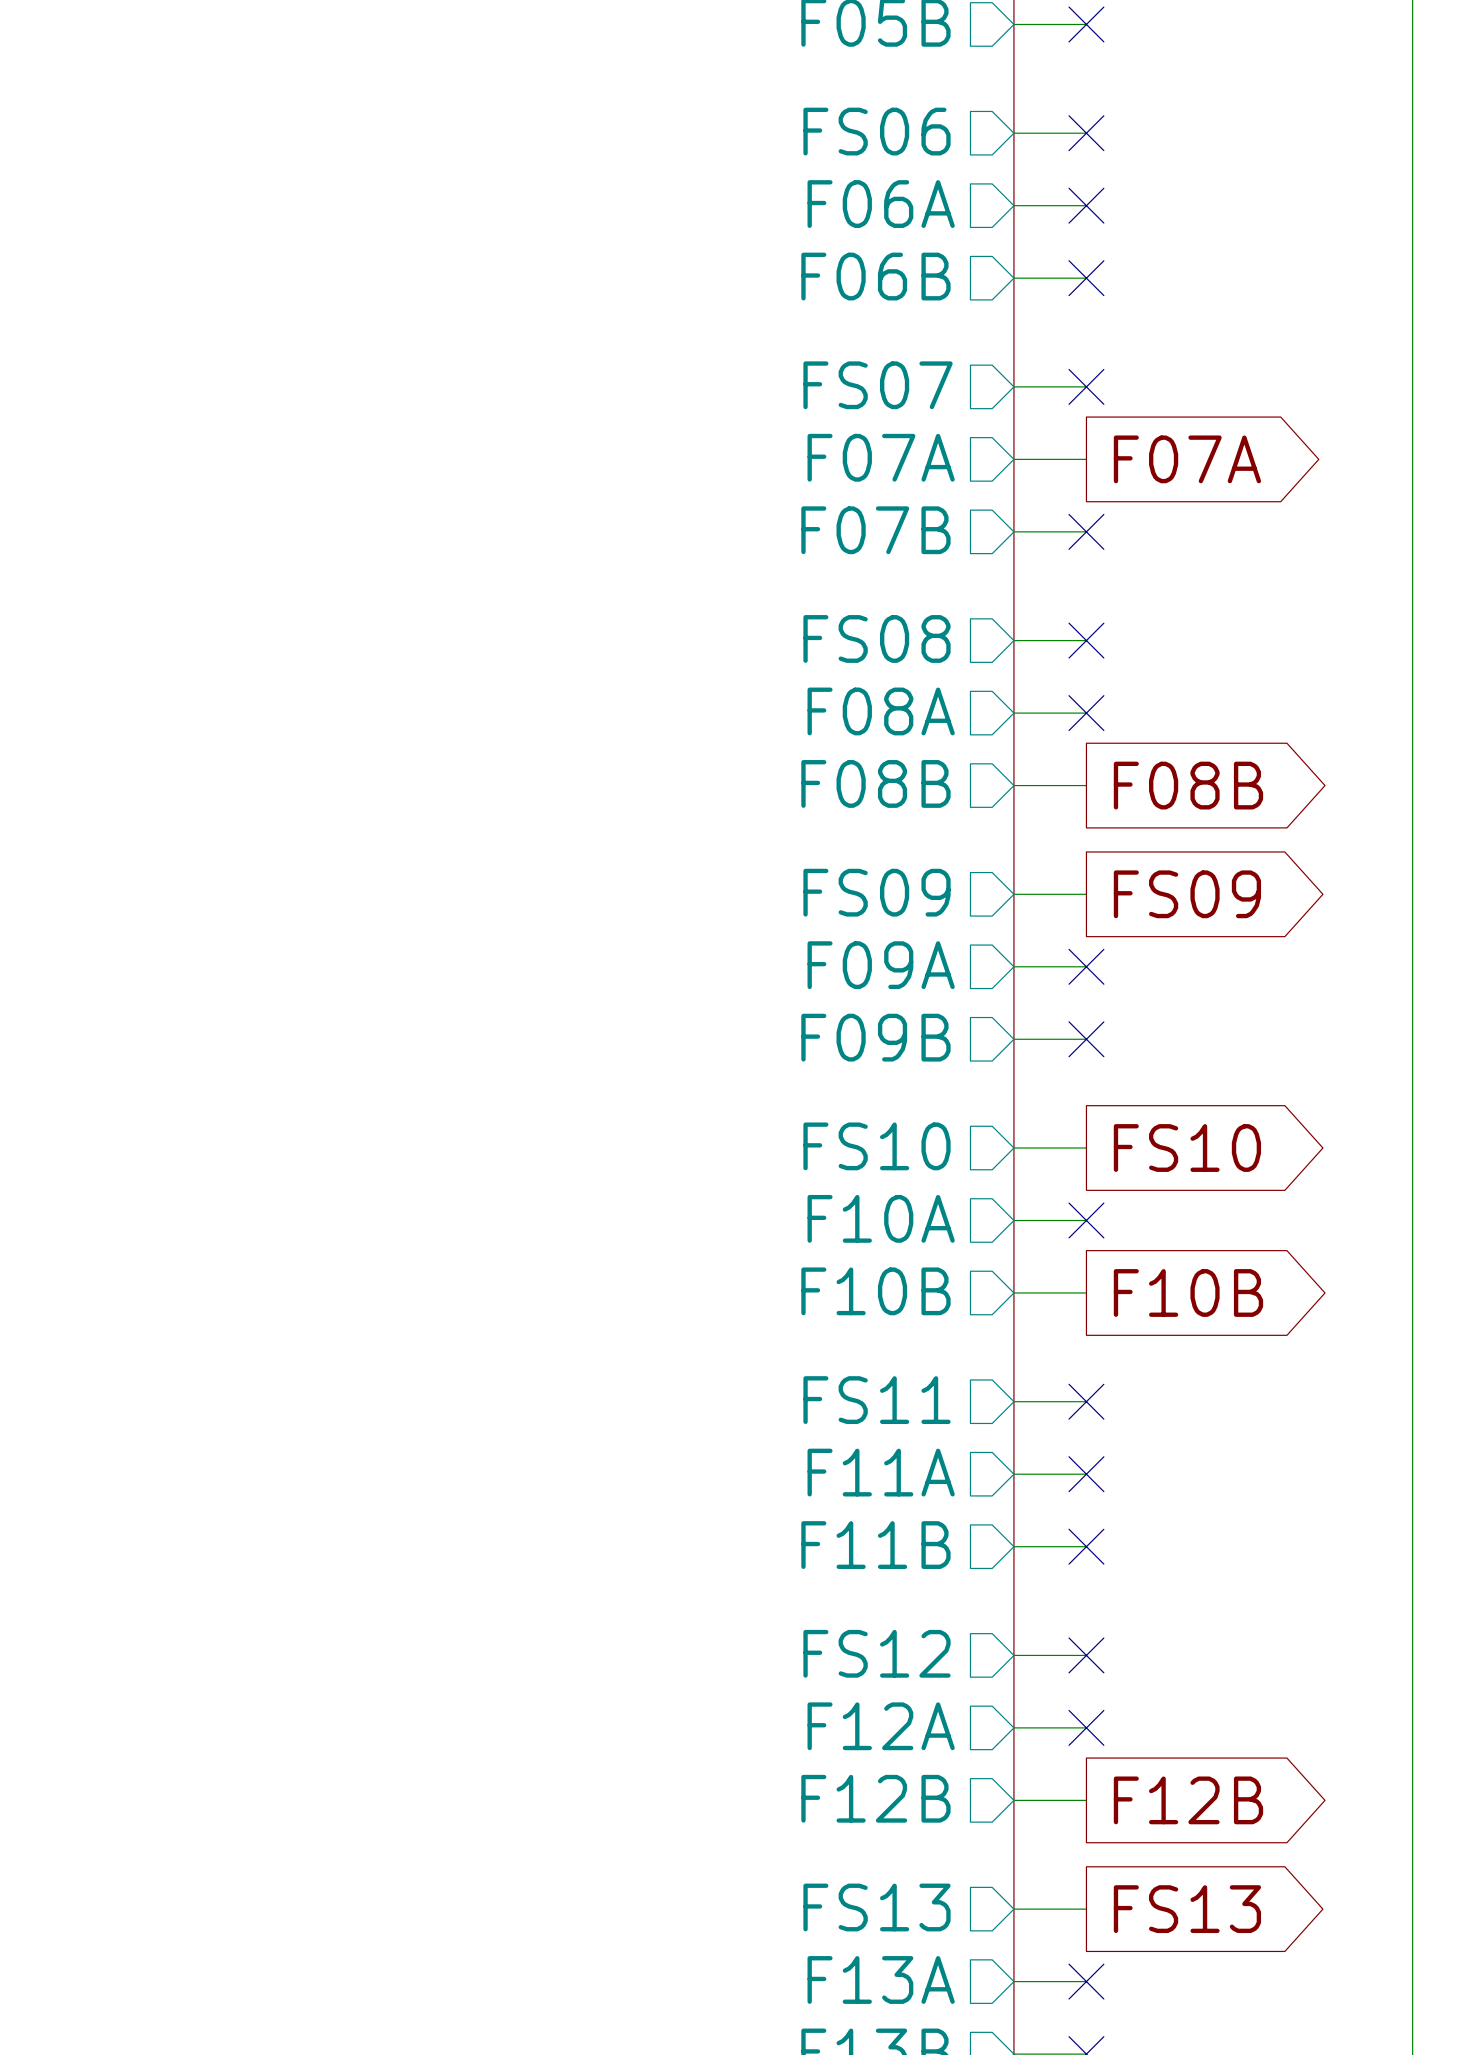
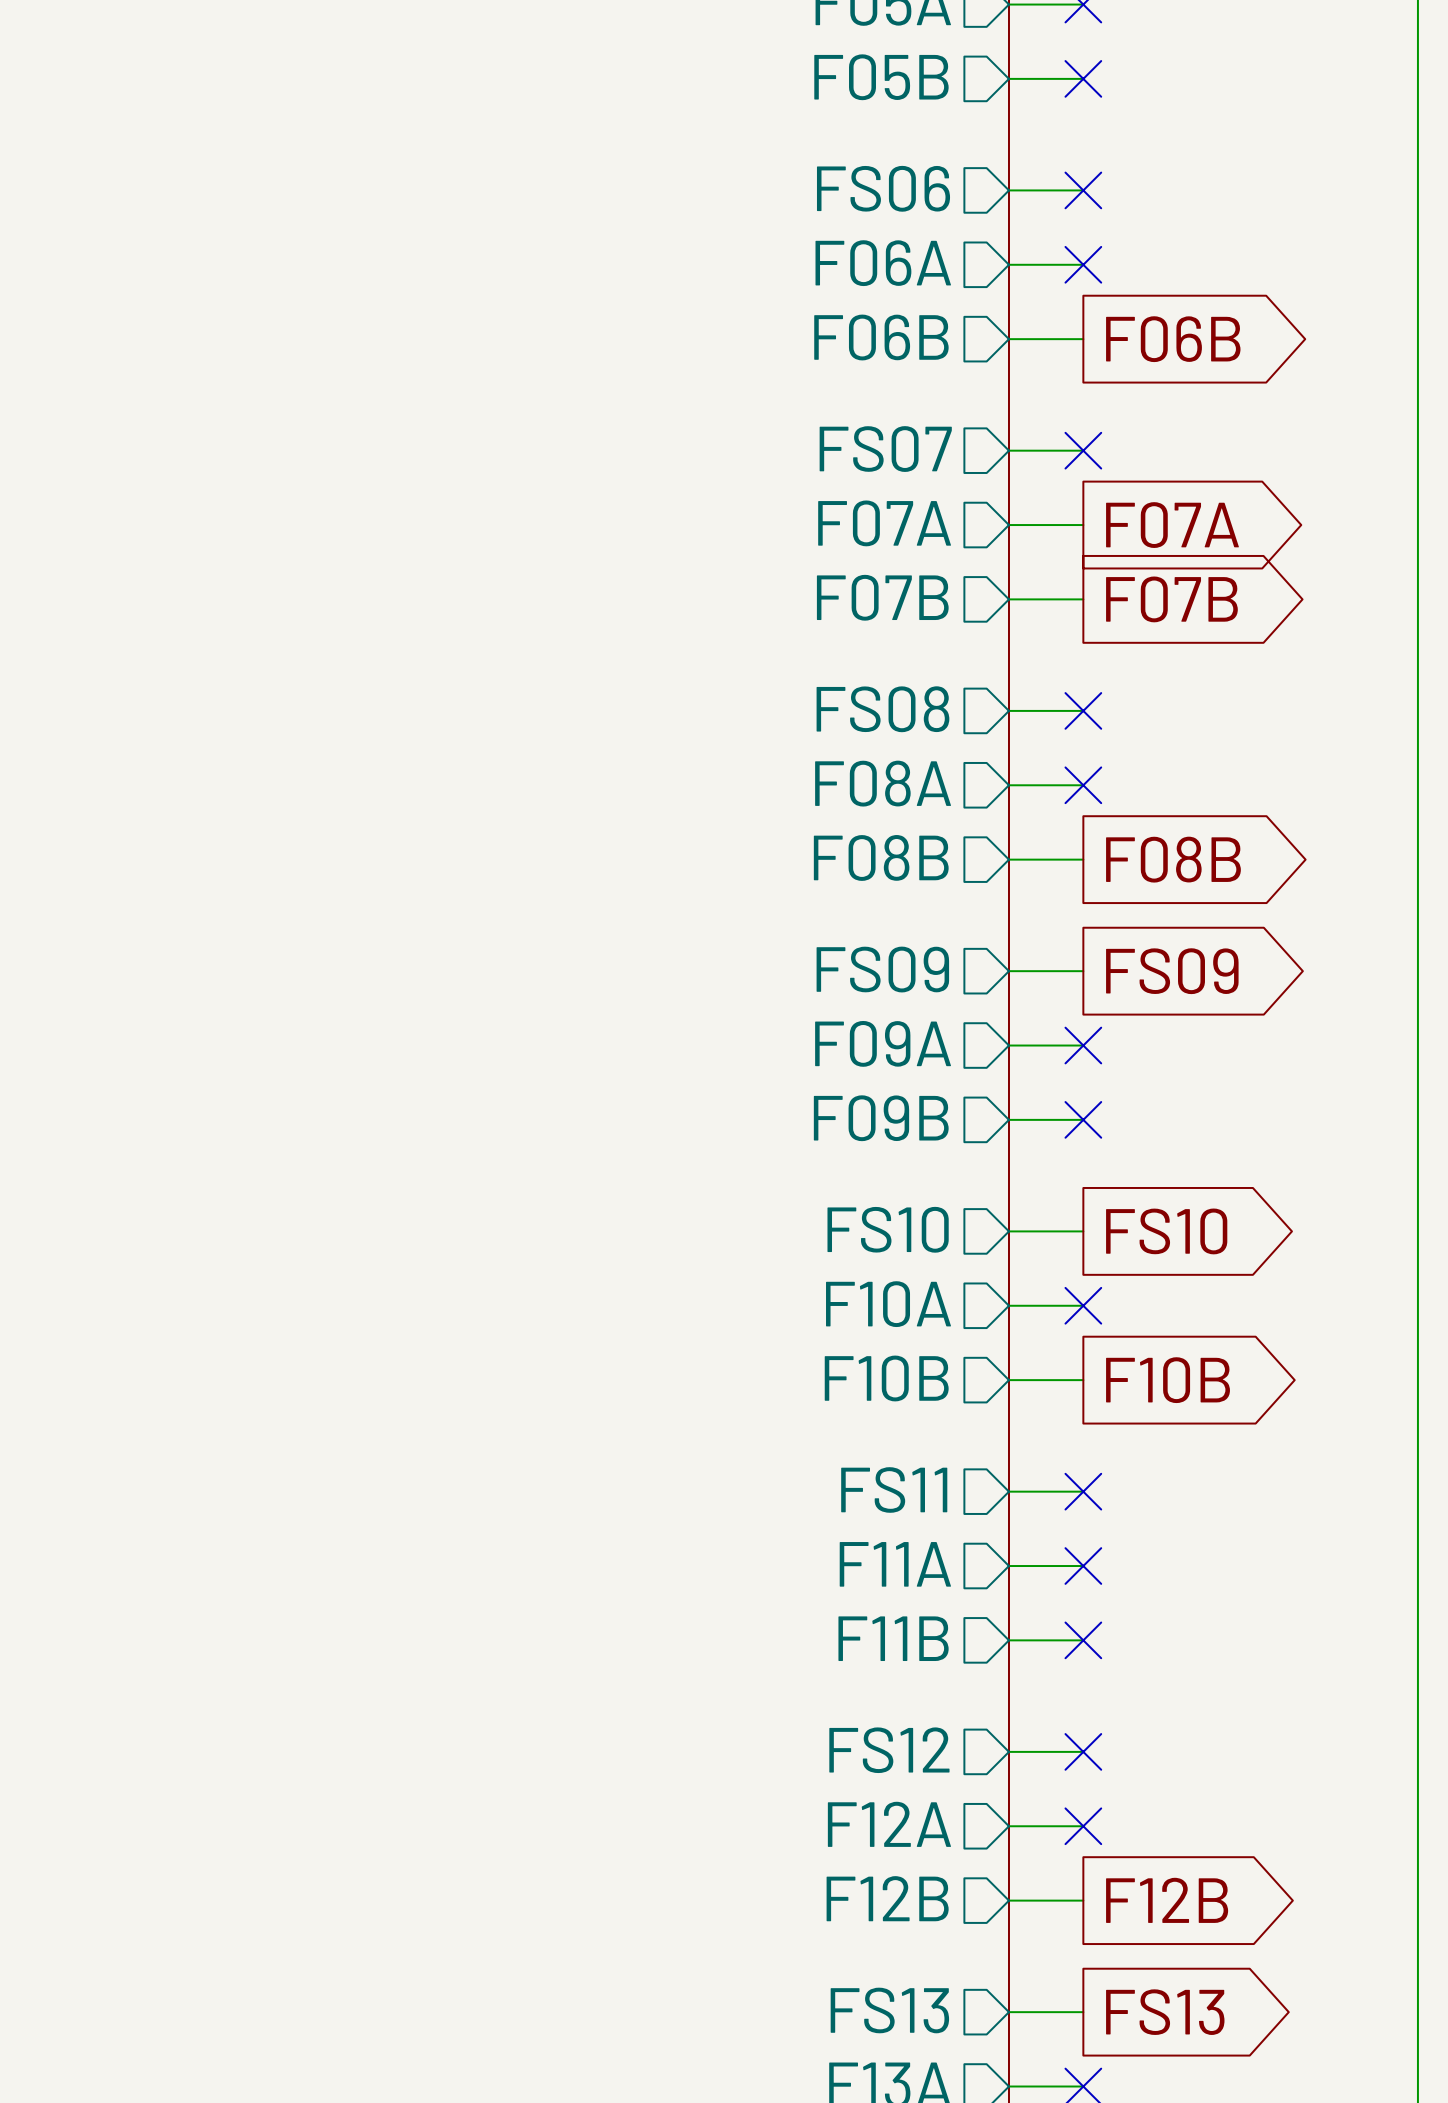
no-connect mark: (1086, 278) -> none
global label: none -> F06B (1173, 339)
no-connect mark: (1086, 531) -> none
global label: none -> F07B (1171, 599)

